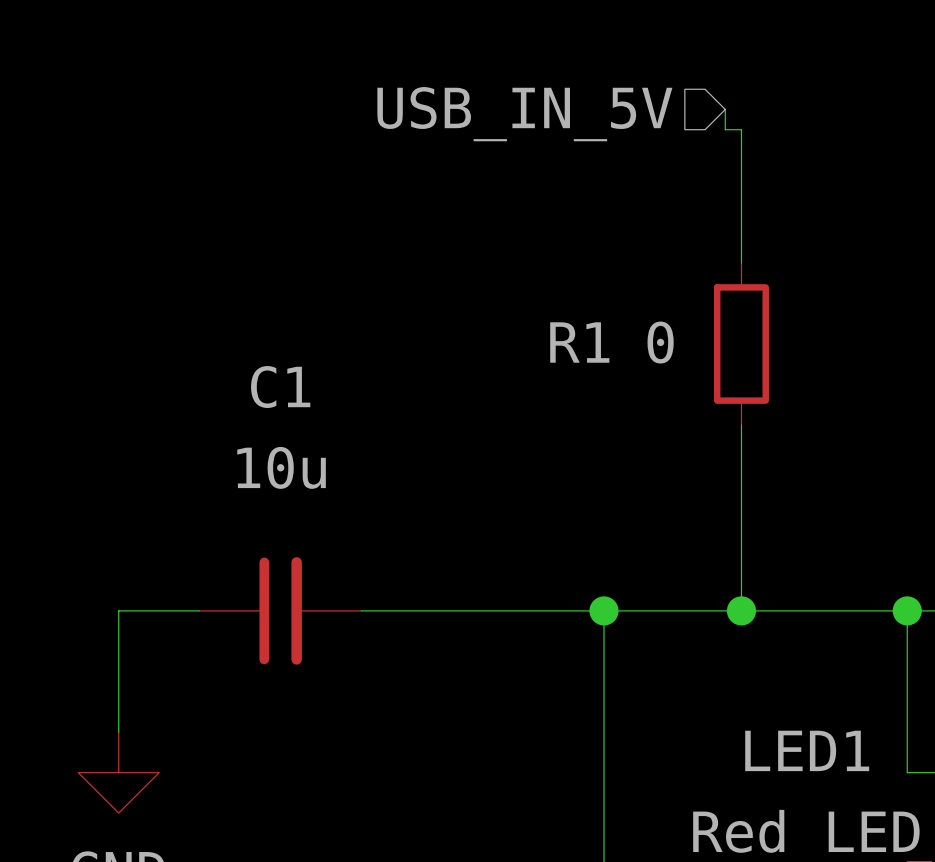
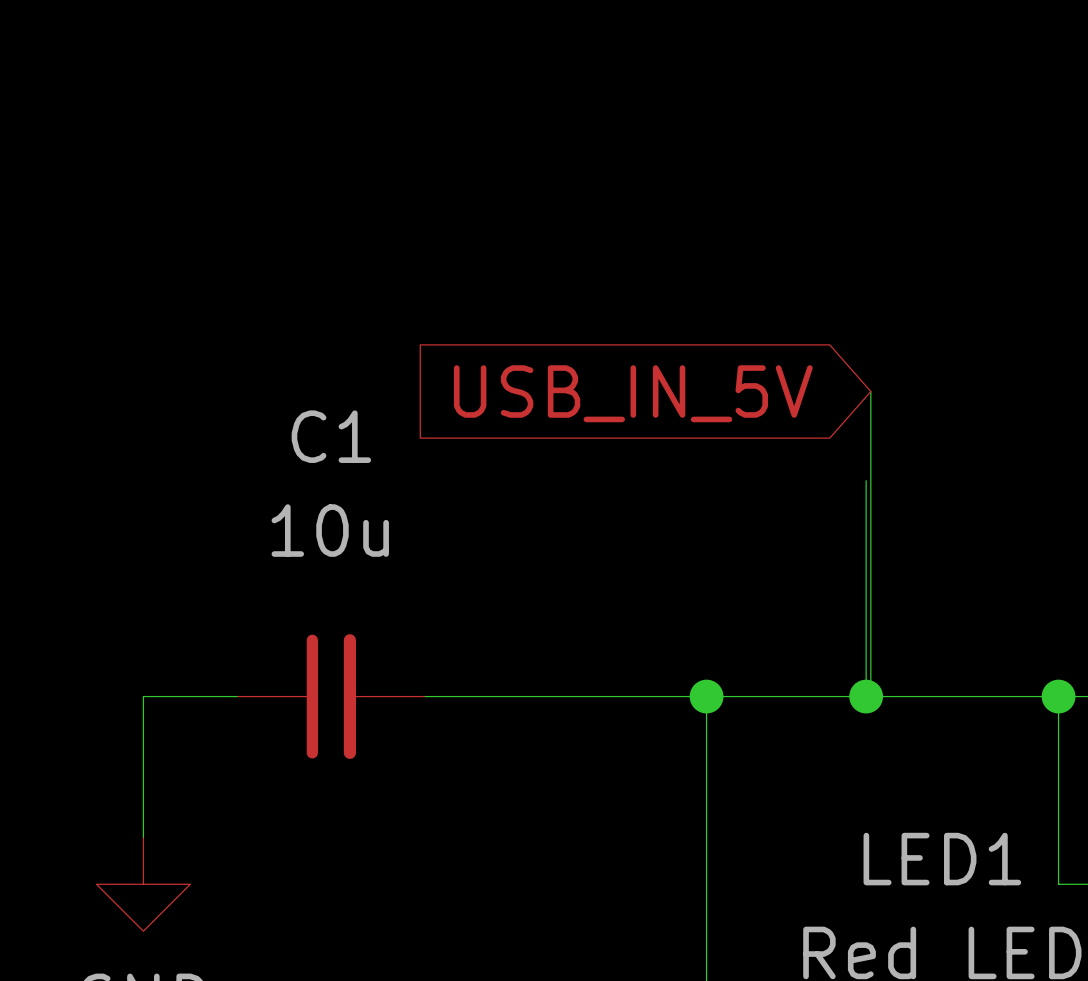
wire: (725, 109) (725, 129) (741, 129) (741, 263) -> none
hierarchical label: USB_IN_5V (524, 114) -> none
R1: 0 (741, 344) -> none
wire: none -> (870, 391) (870, 696)
global label: none -> USB_IN_5V (633, 393)

